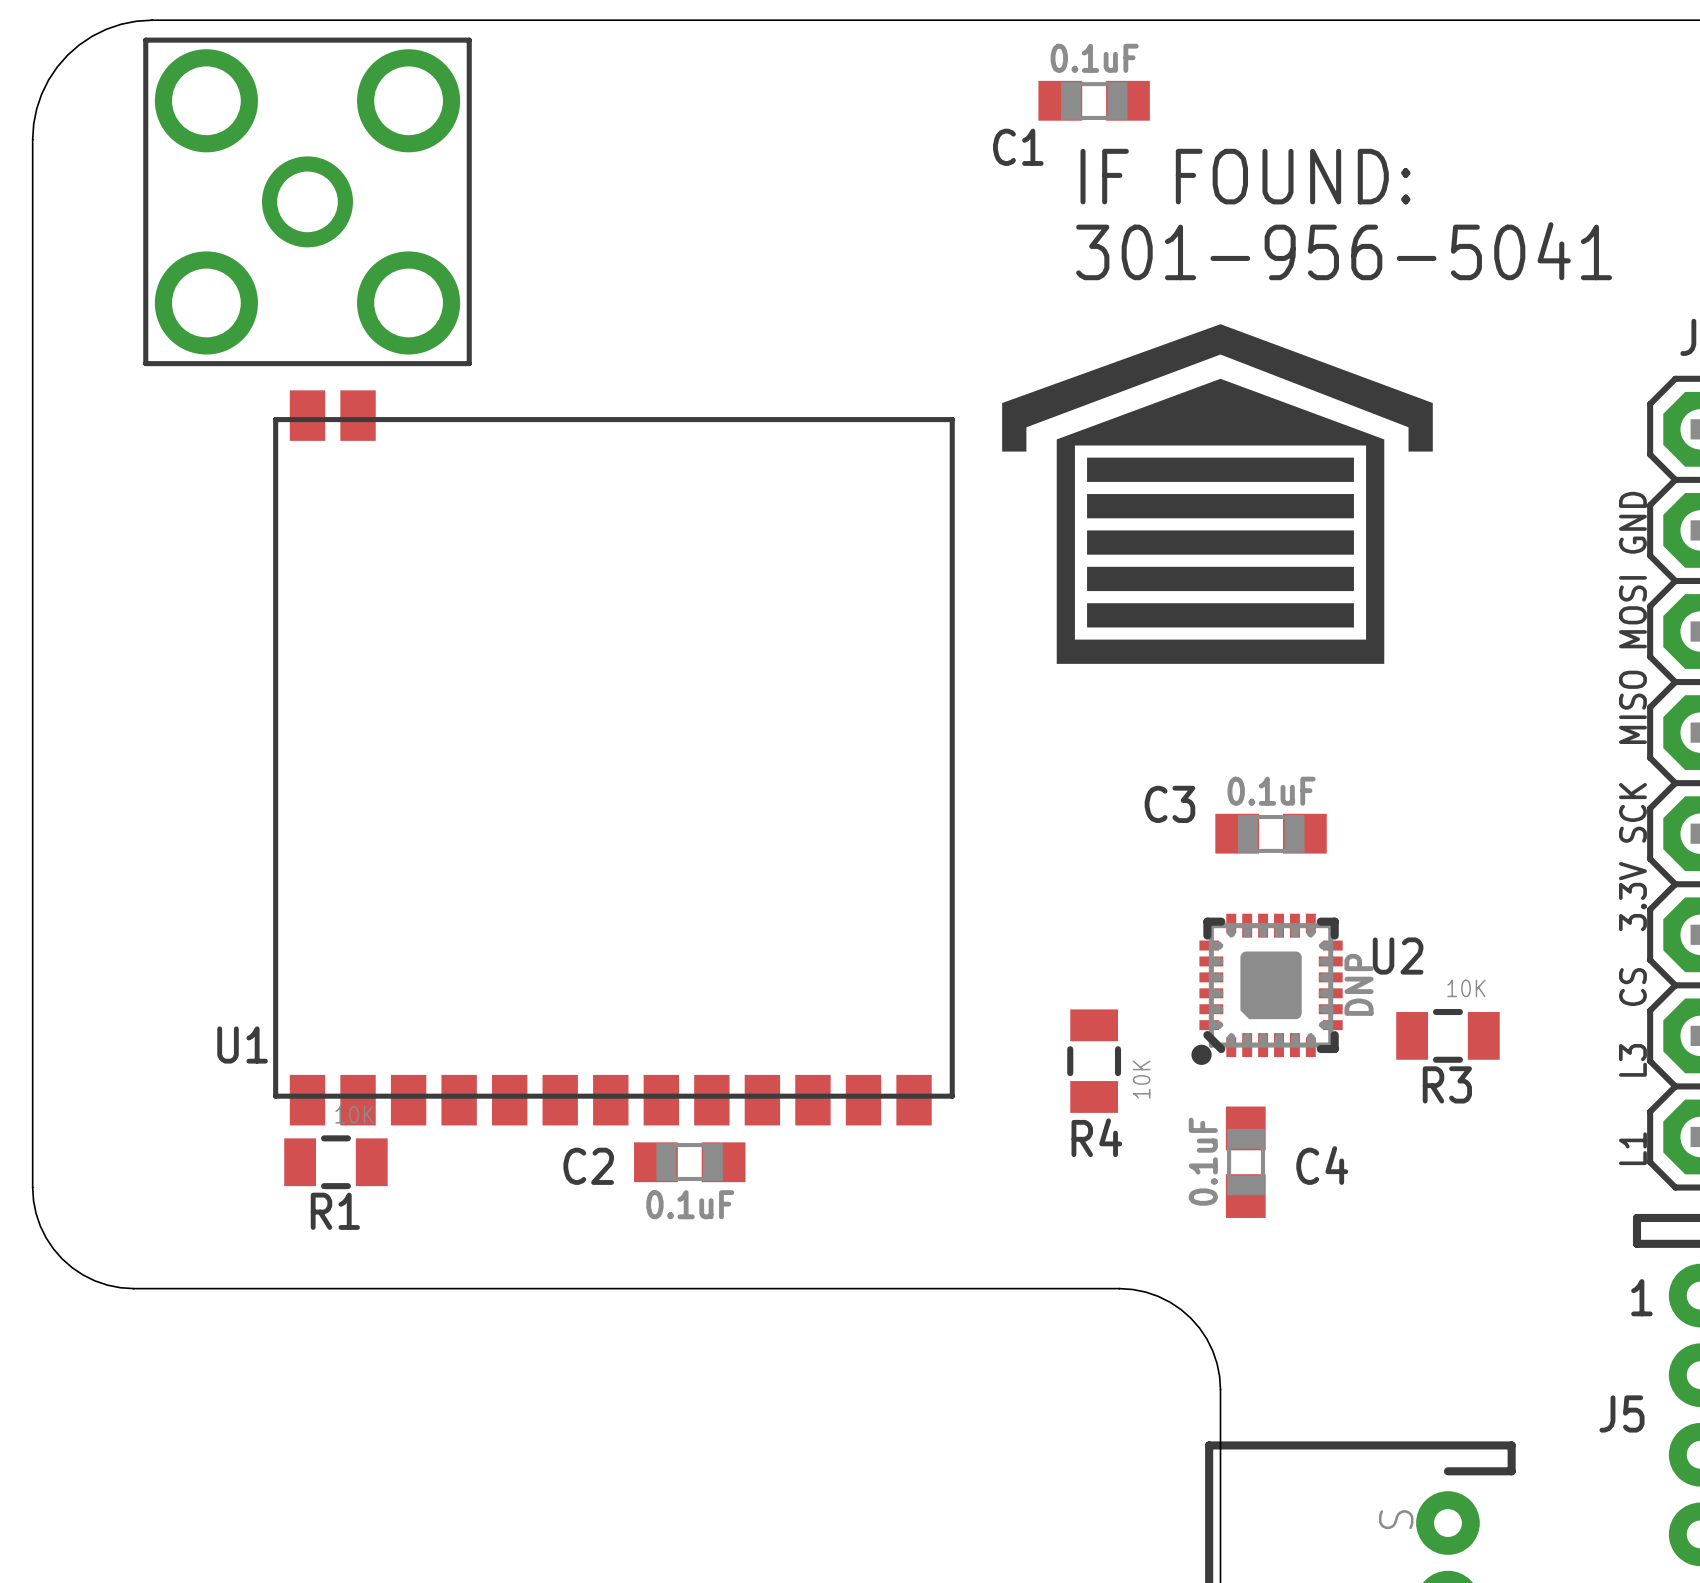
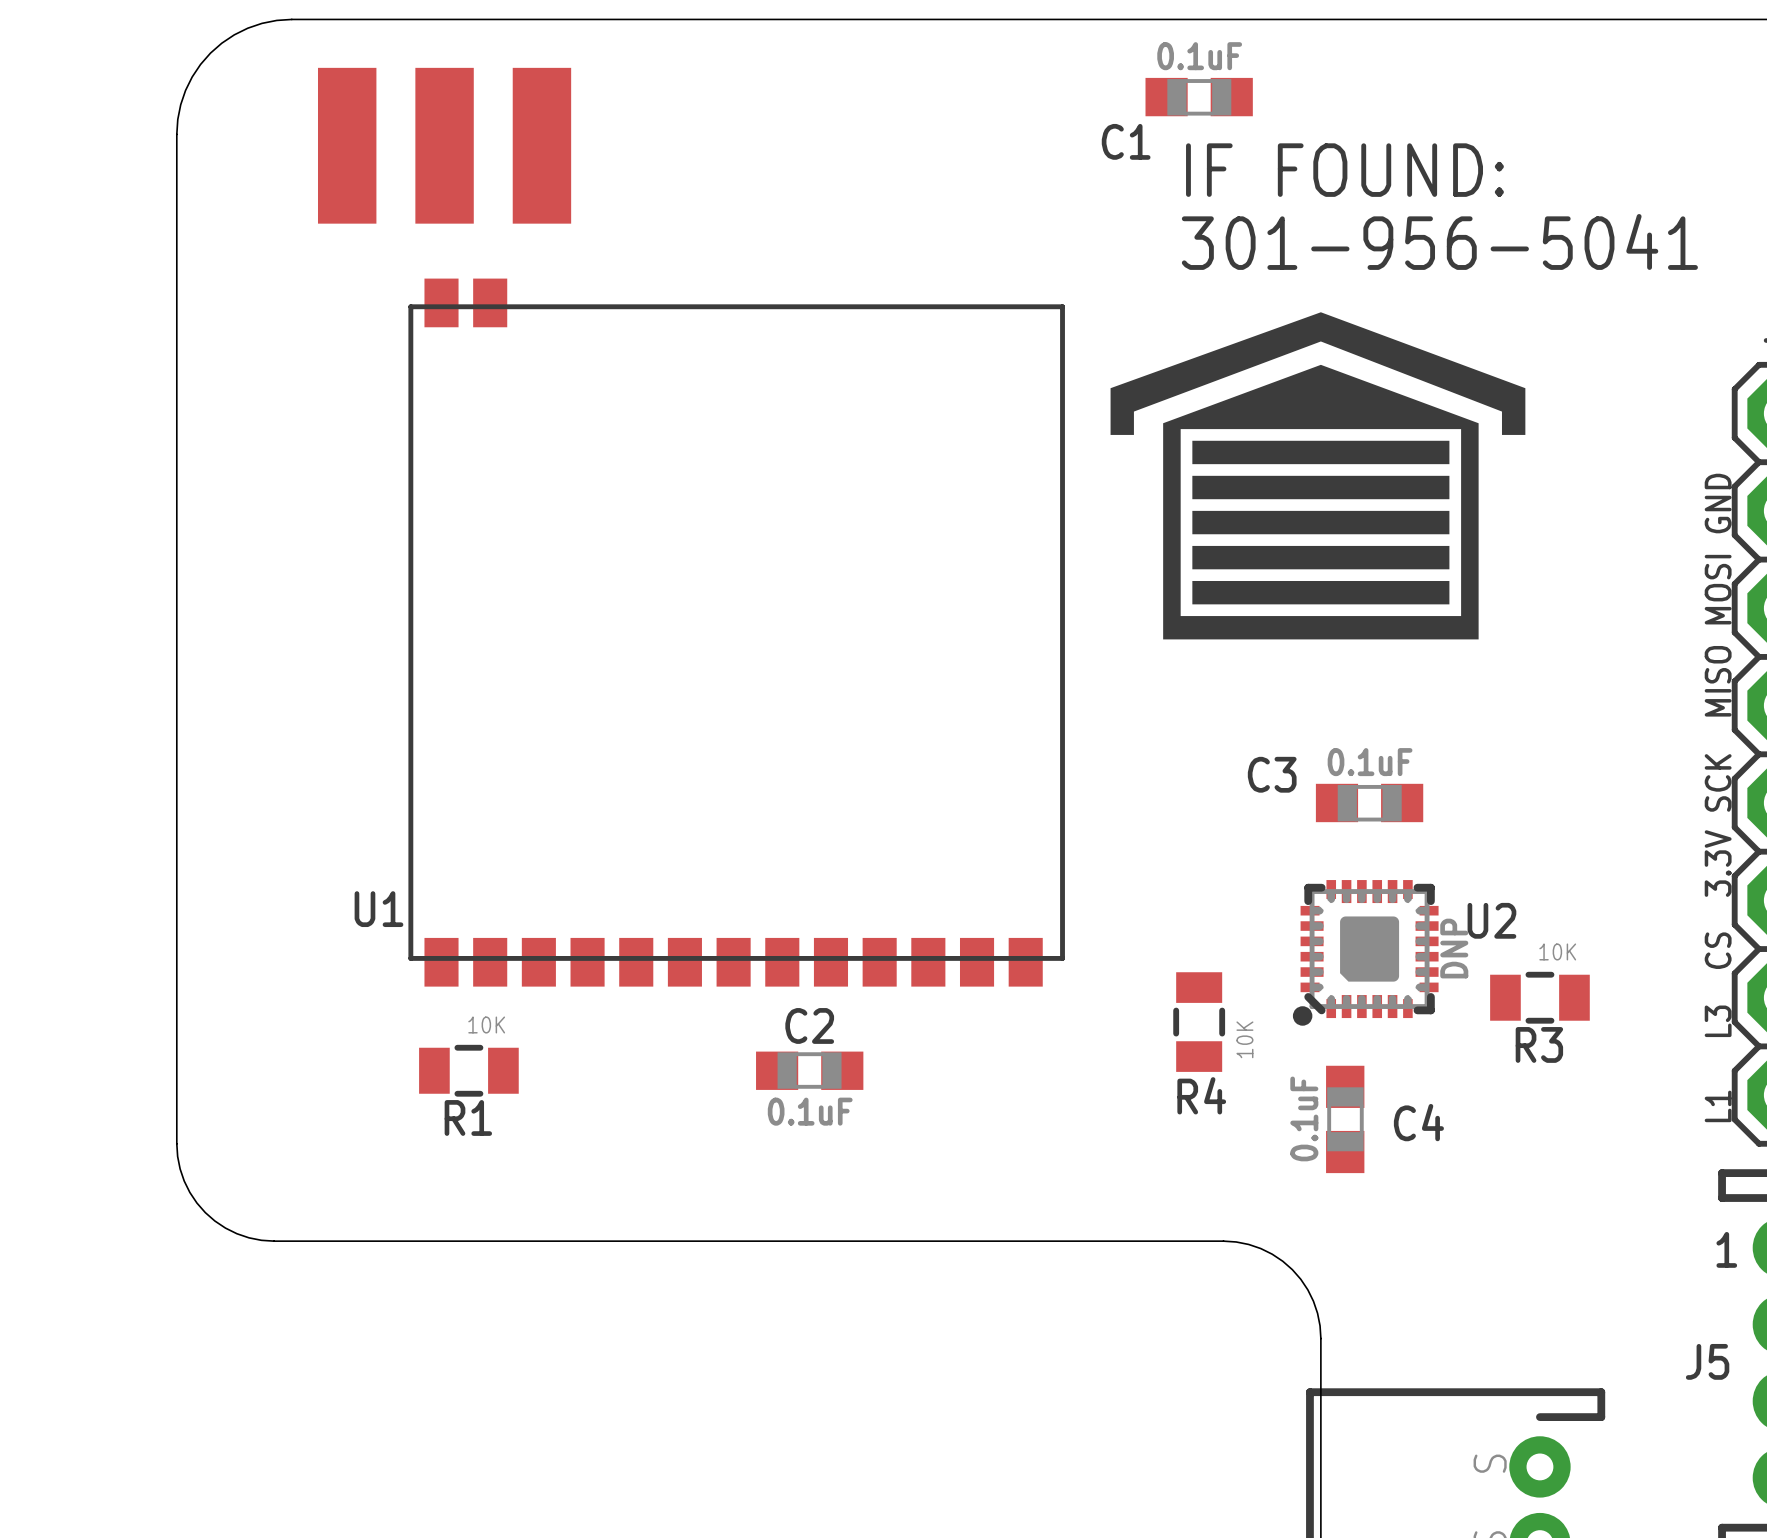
part: none -> (444, 145)
part: (307, 201) -> none
U1 position: (613, 757) -> (736, 632)
R1 position: (335, 1162) -> (468, 1070)
C2 position: (689, 1162) -> (809, 1070)
C2 name position: C2 (588, 1166) -> C2 (809, 1025)

